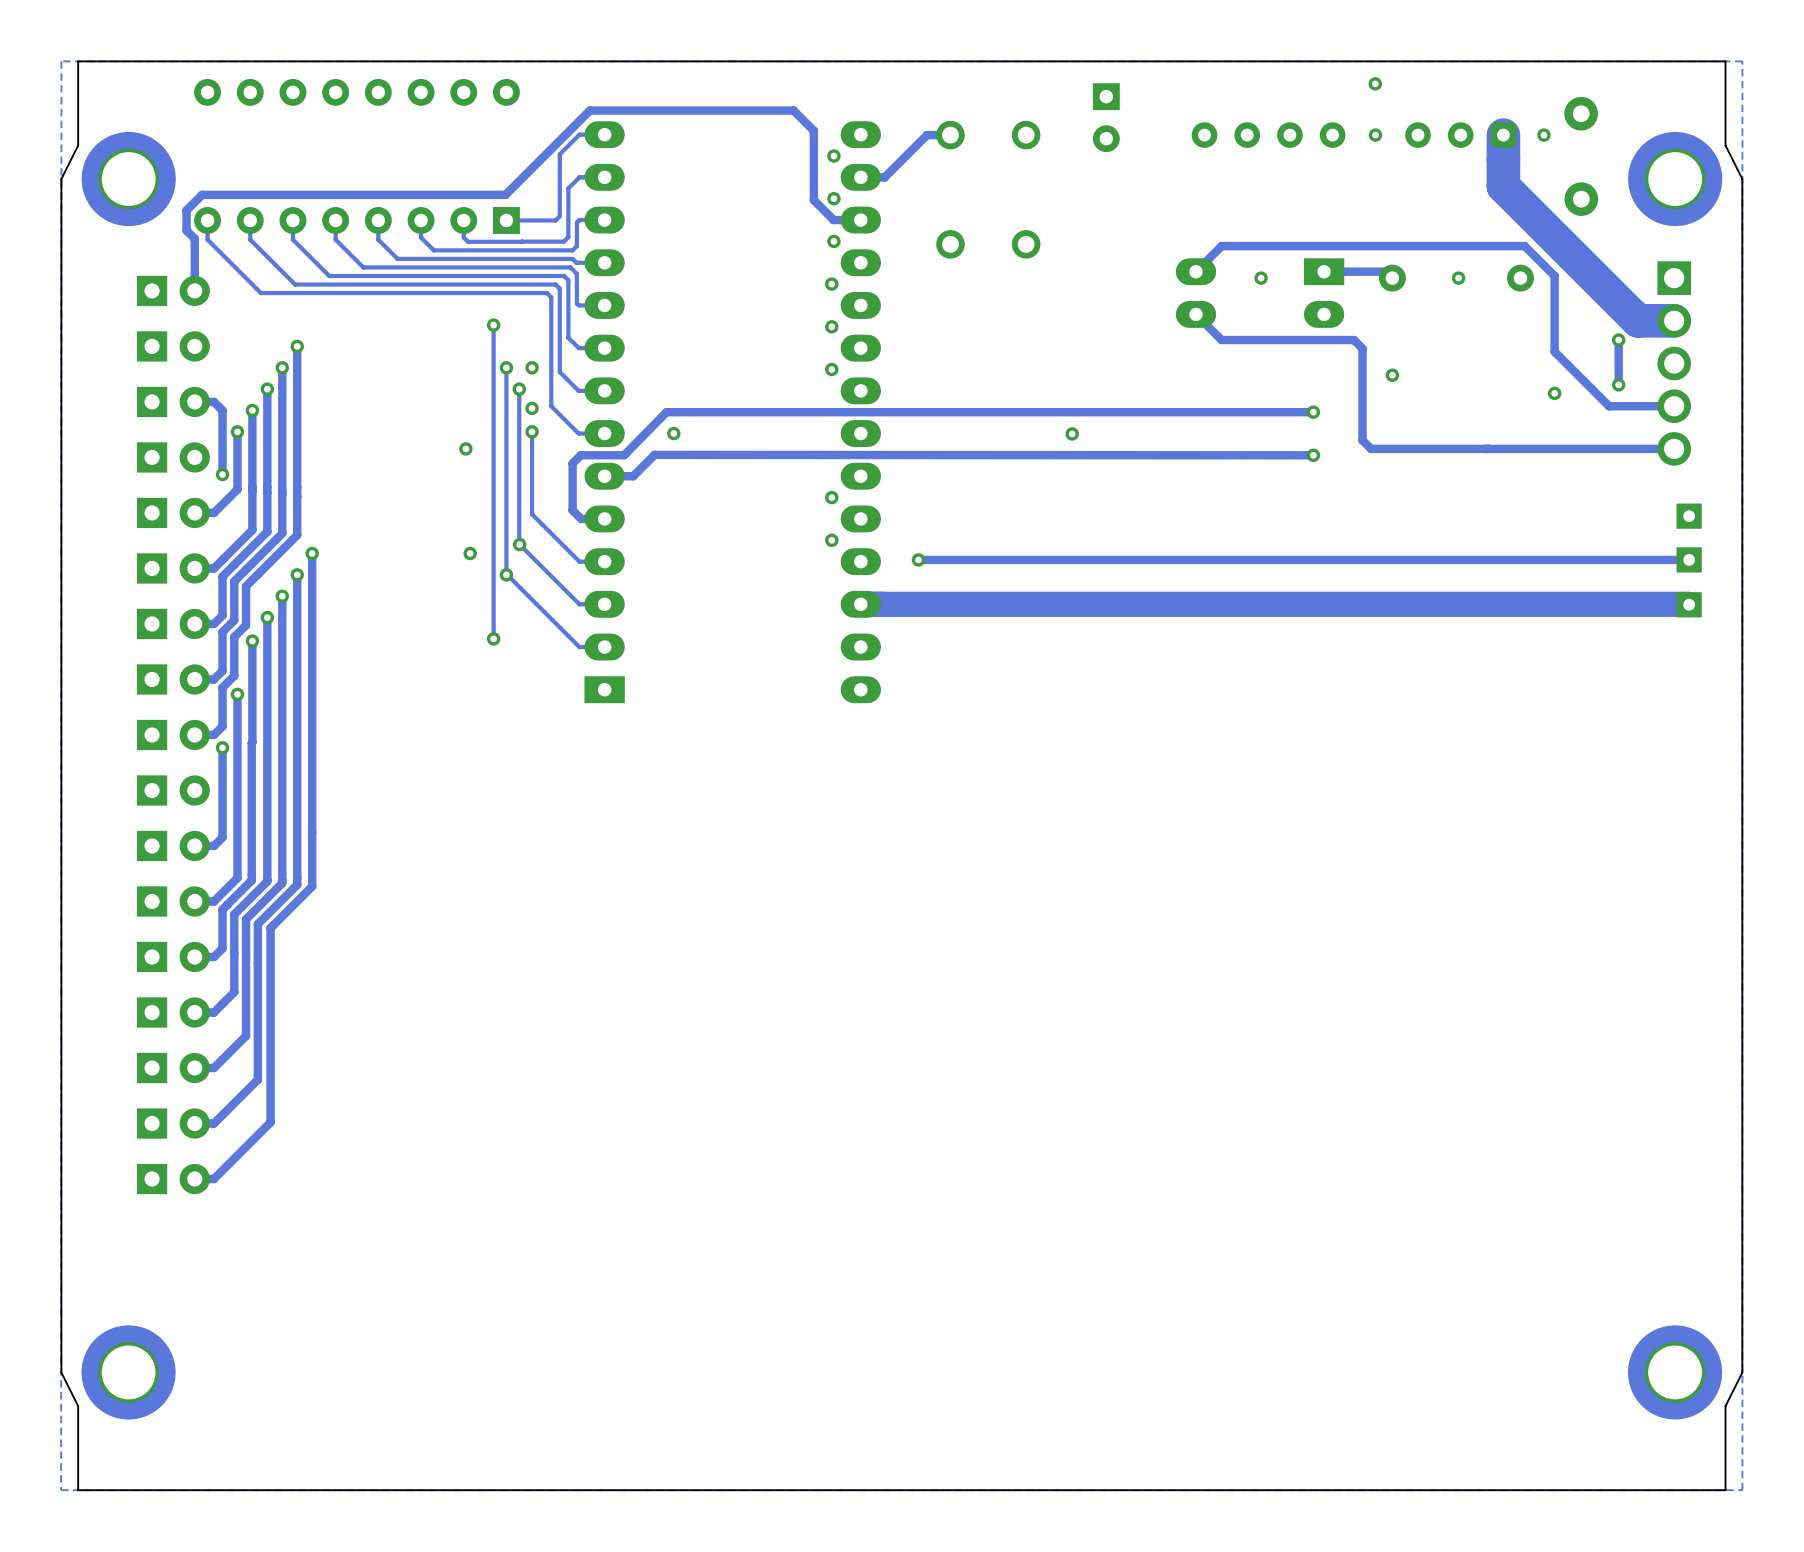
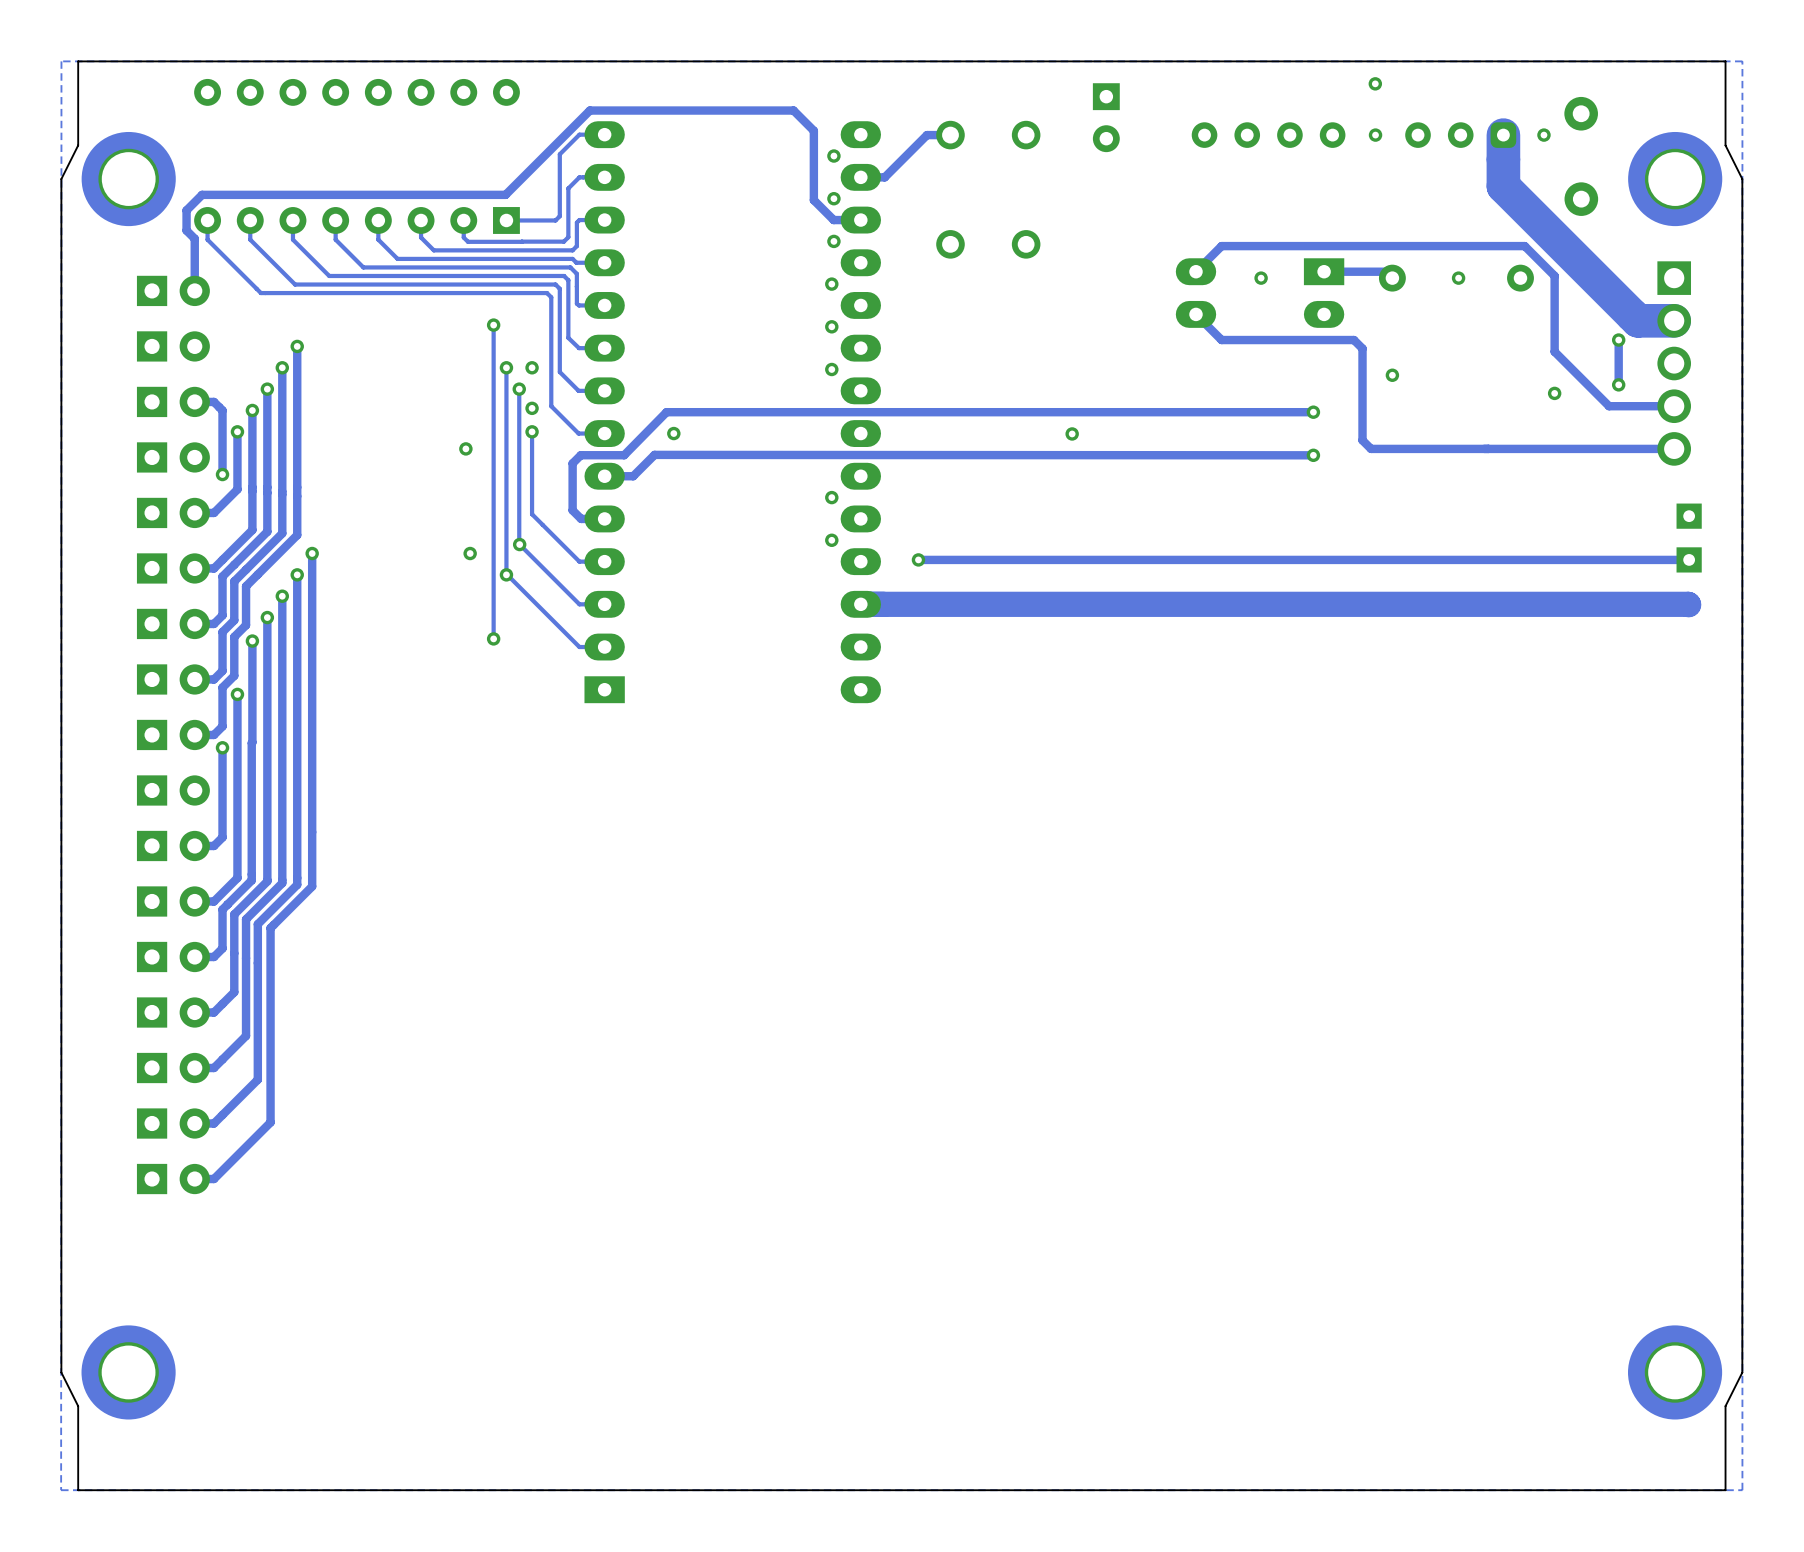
part: (1689, 604) -> none

